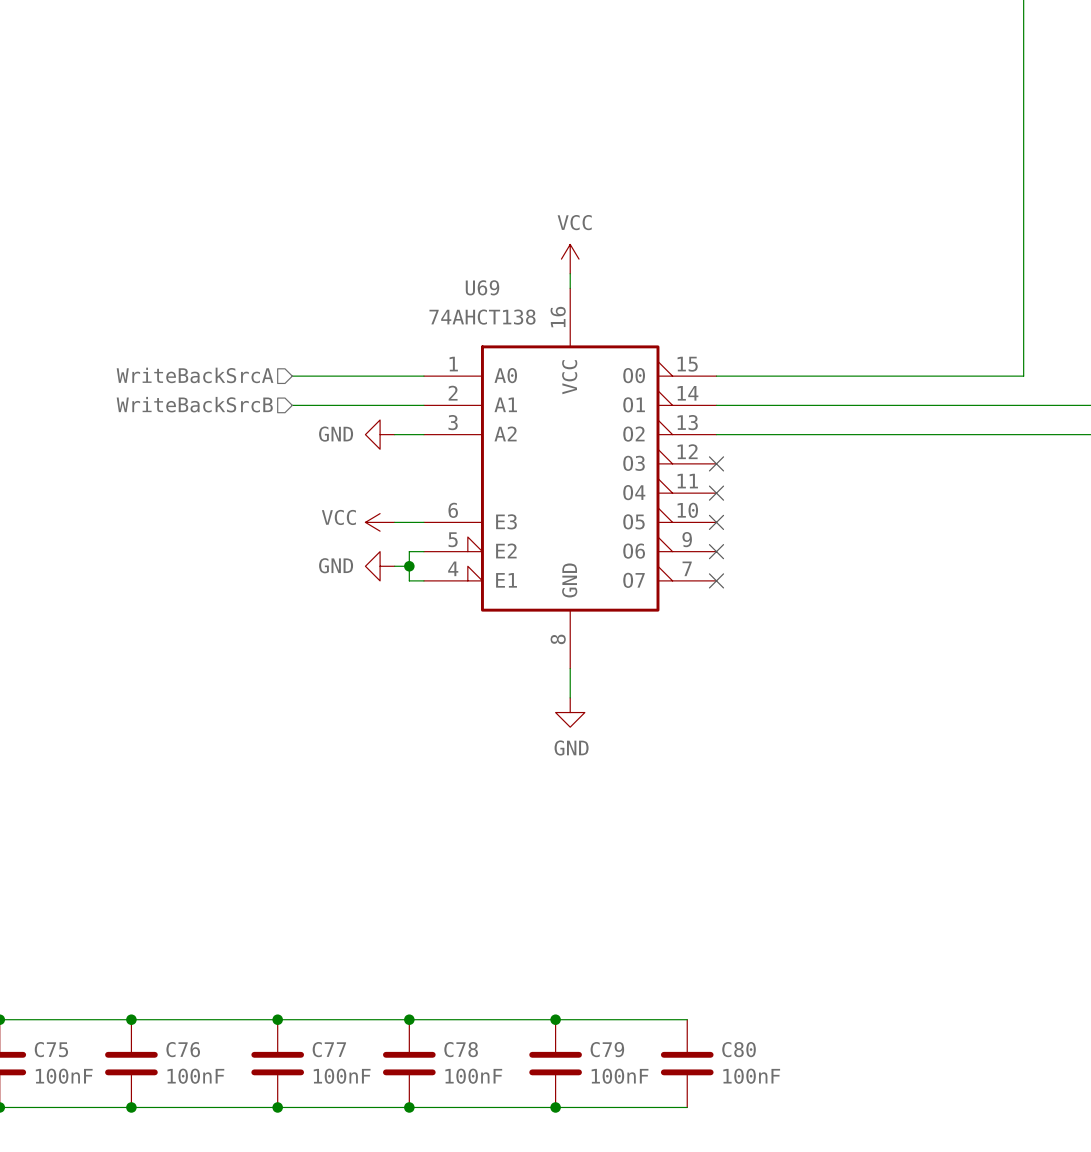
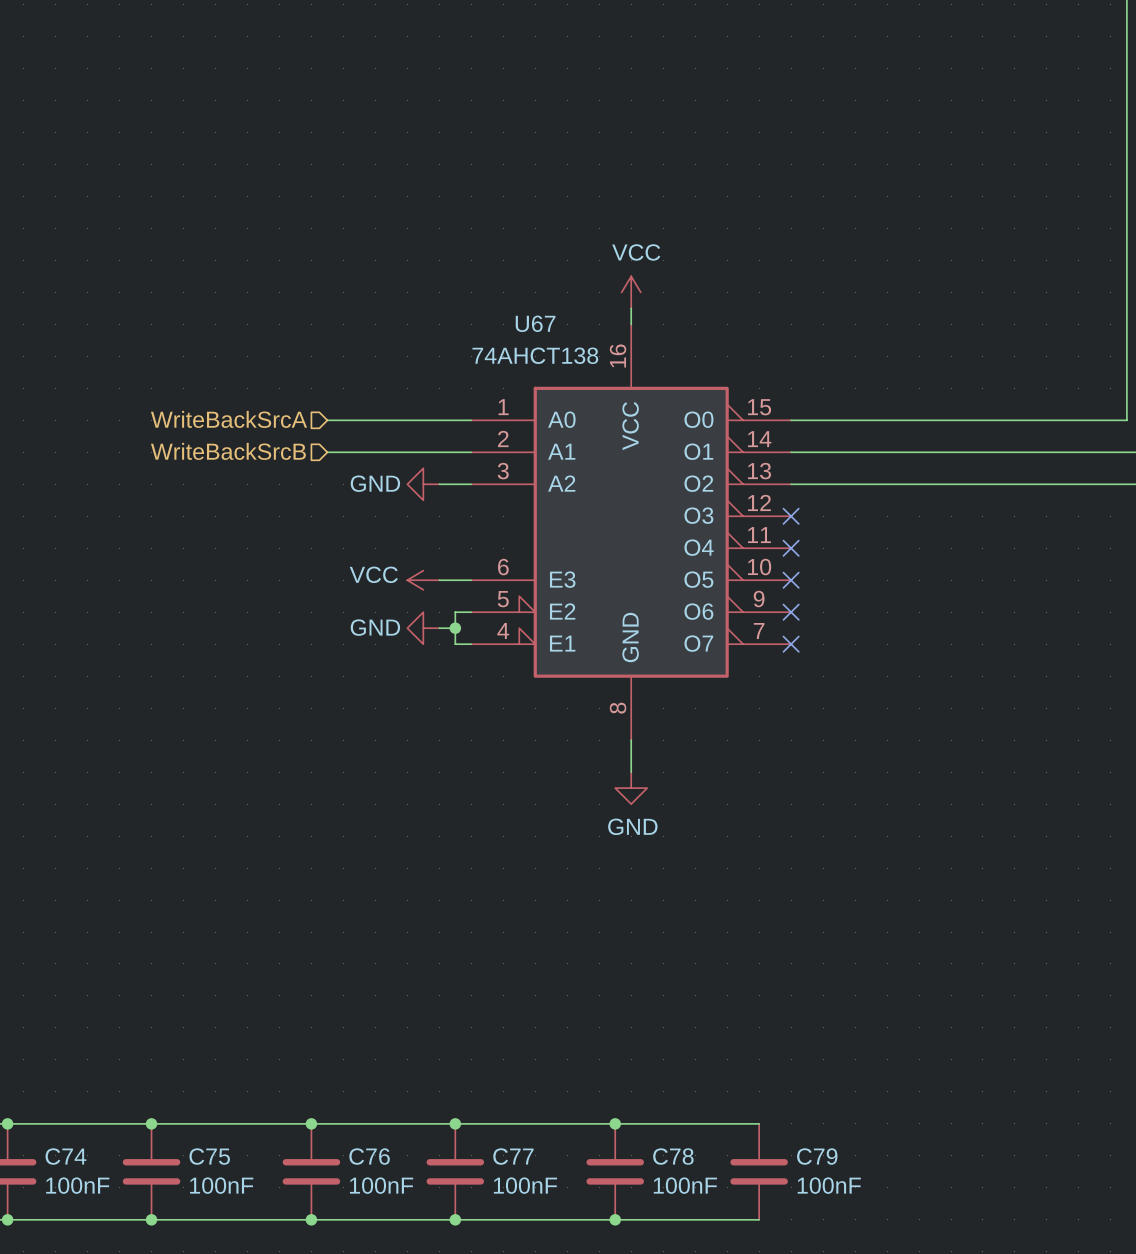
U69 name: U69 (482, 287) -> U67 (535, 323)
C75 name: C75 (51, 1049) -> C74 (65, 1156)
C76 name: C76 (183, 1049) -> C75 (209, 1156)
C77 name: C77 (329, 1049) -> C76 (369, 1156)
C78 name: C78 (461, 1049) -> C77 (513, 1156)
C79 name: C79 (607, 1049) -> C78 (673, 1156)
C80 name: C80 (739, 1049) -> C79 (817, 1156)

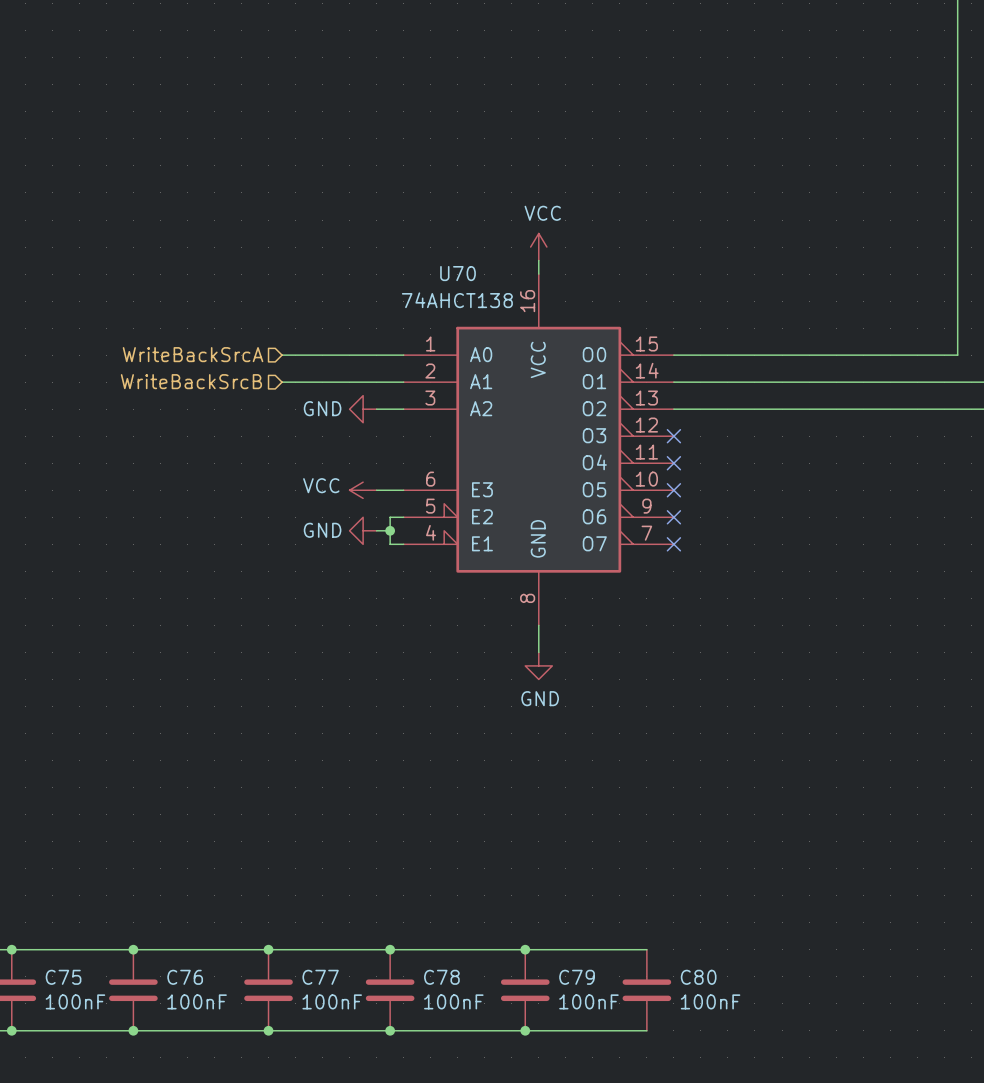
U67 name: U67 (535, 323) -> U70 (458, 273)
C74 name: C74 (65, 1156) -> C75 (63, 977)
C75 name: C75 (209, 1156) -> C76 (185, 977)
C76 name: C76 (369, 1156) -> C77 (320, 977)
C77 name: C77 (513, 1156) -> C78 (441, 977)
C78 name: C78 (673, 1156) -> C79 (577, 977)
C79 name: C79 (817, 1156) -> C80 (698, 977)

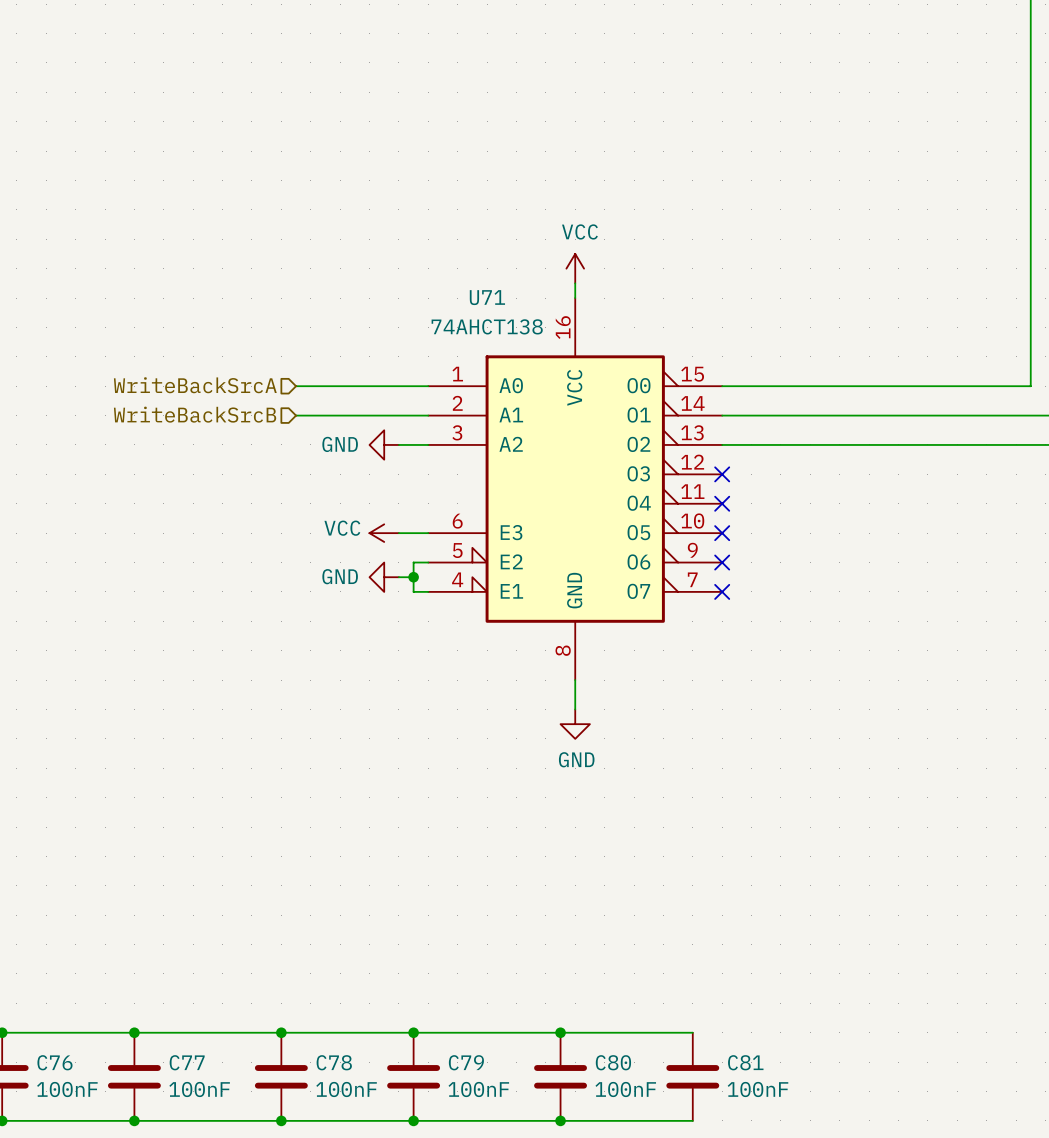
U70 name: U70 (458, 273) -> U71 (487, 297)
C75 name: C75 (63, 977) -> C76 (54, 1062)
C76 name: C76 (185, 977) -> C77 (187, 1062)
C77 name: C77 (320, 977) -> C78 (334, 1062)
C78 name: C78 (441, 977) -> C79 (466, 1062)
C79 name: C79 (577, 977) -> C80 (613, 1062)
C80 name: C80 (698, 977) -> C81 (745, 1062)

